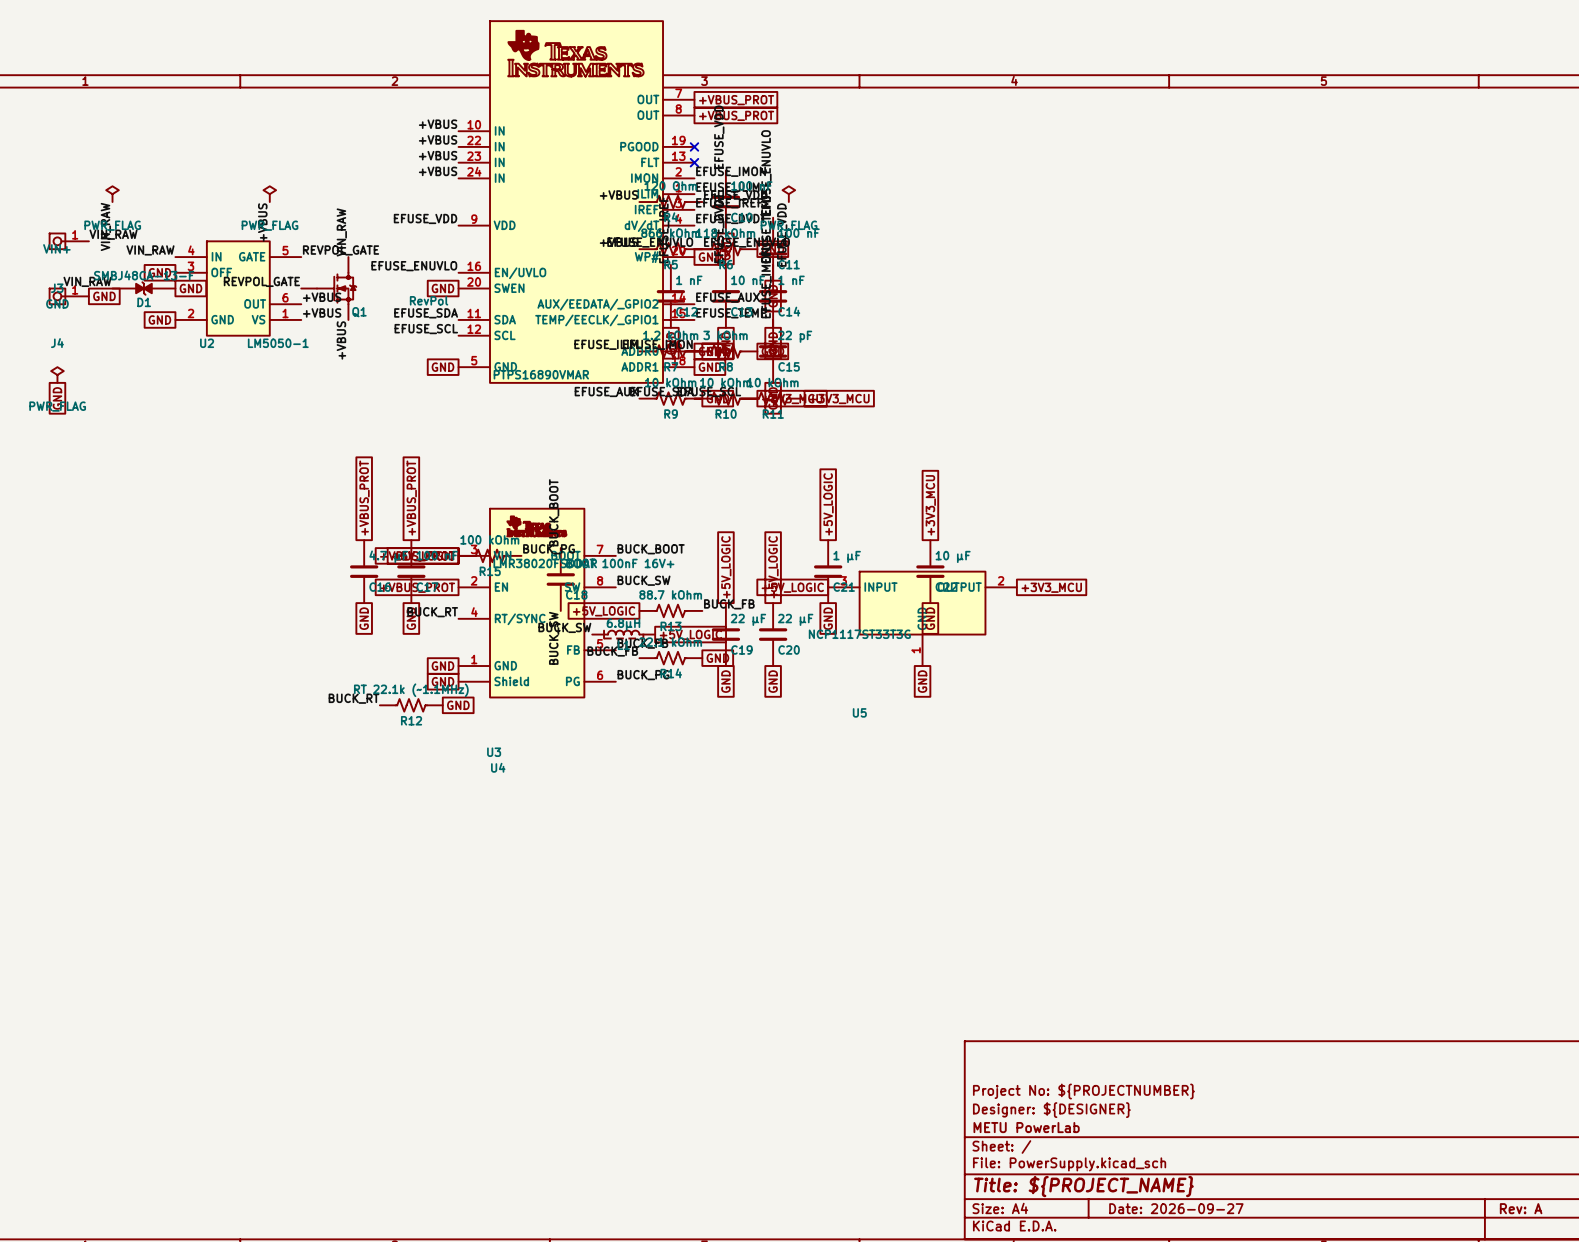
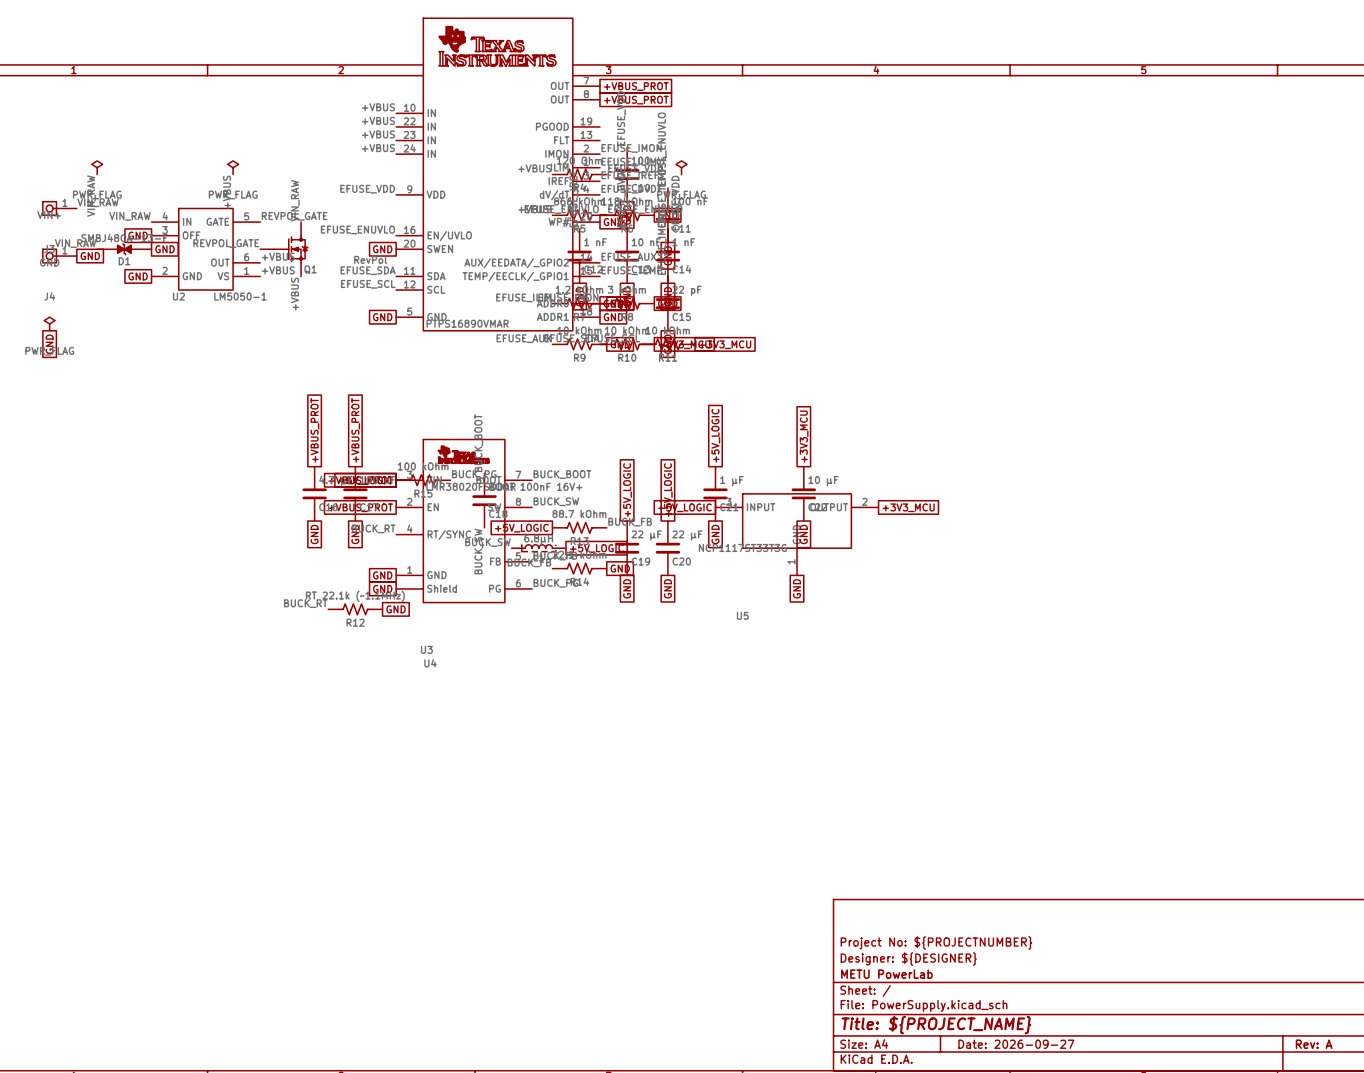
no-connect mark: (694, 146) -> none
no-connect mark: (694, 162) -> none

